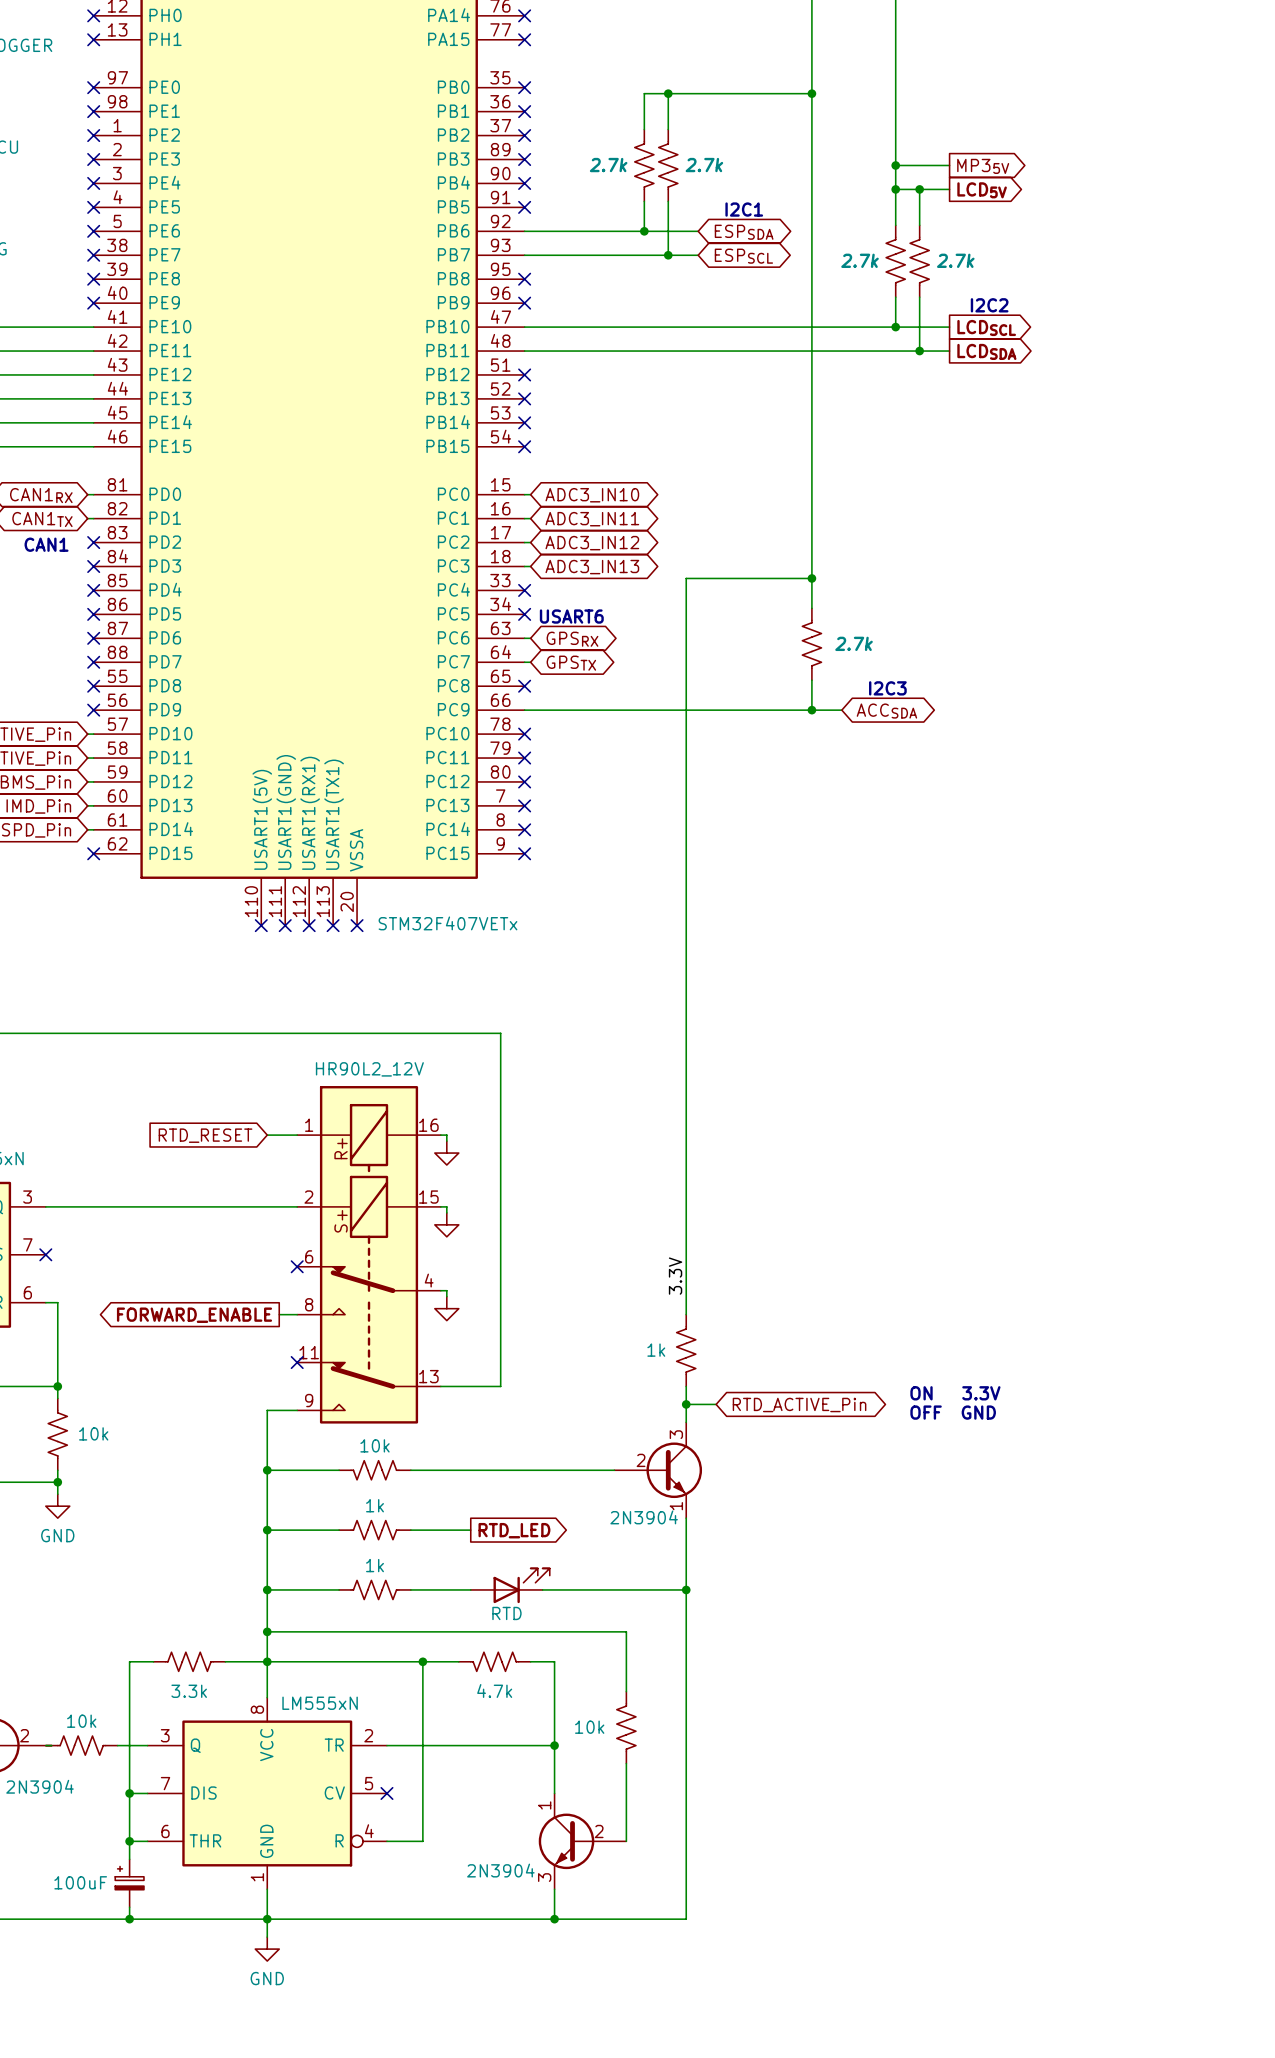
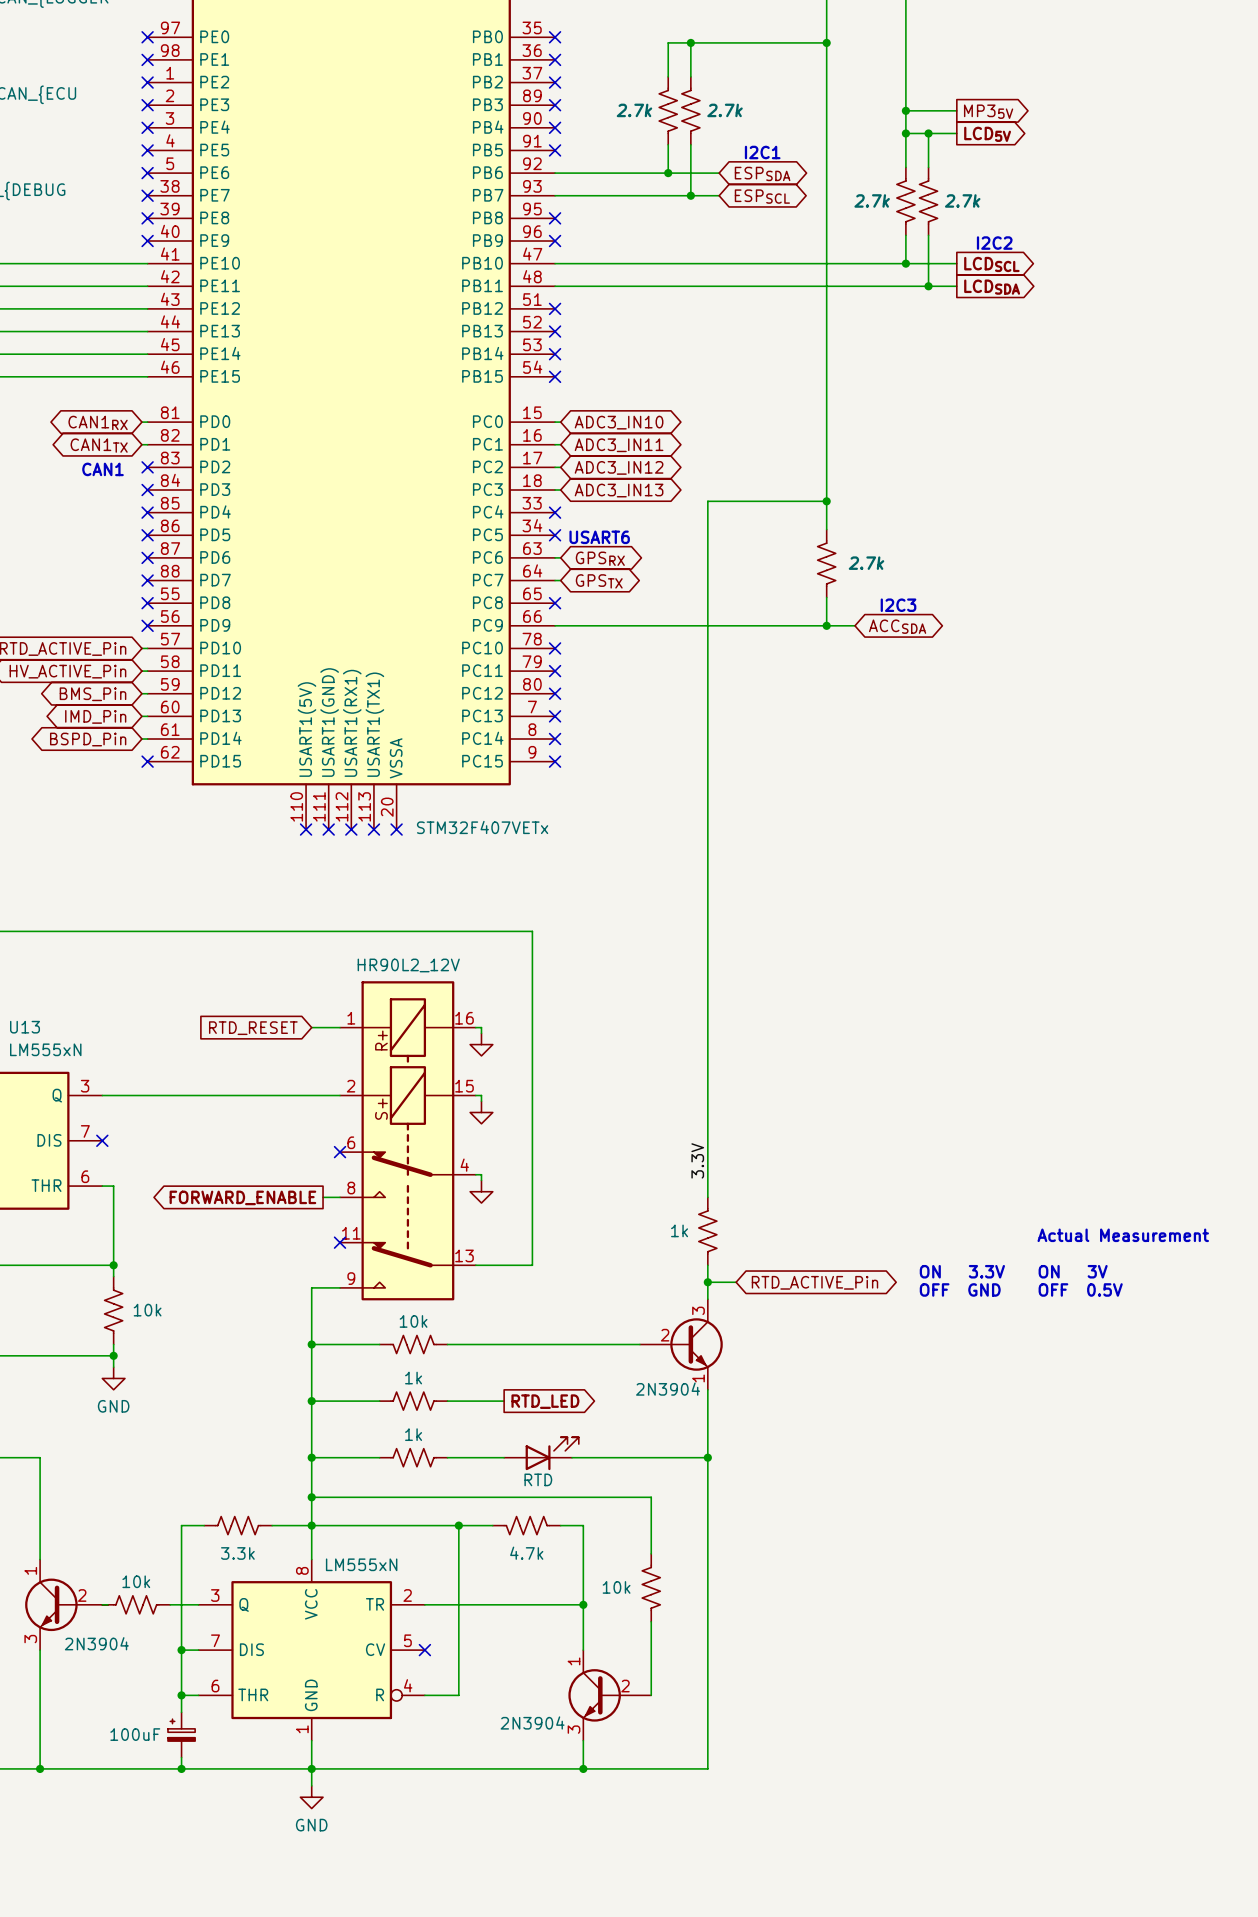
text: none -> Actual Measurement (1123, 1235)
text: none -> ON 3V (1073, 1271)
text: none -> OFF 0.5V (1080, 1289)

